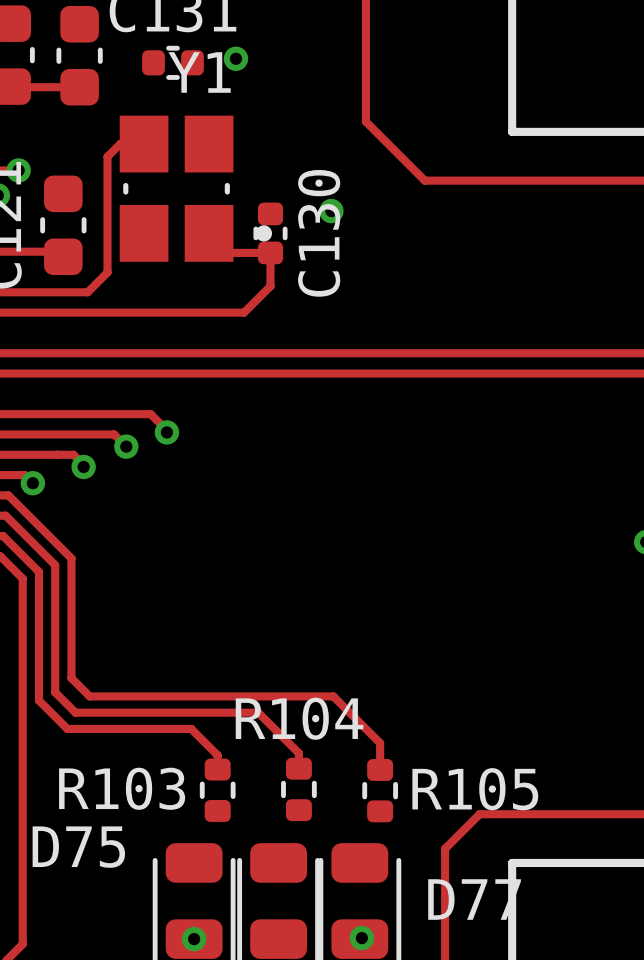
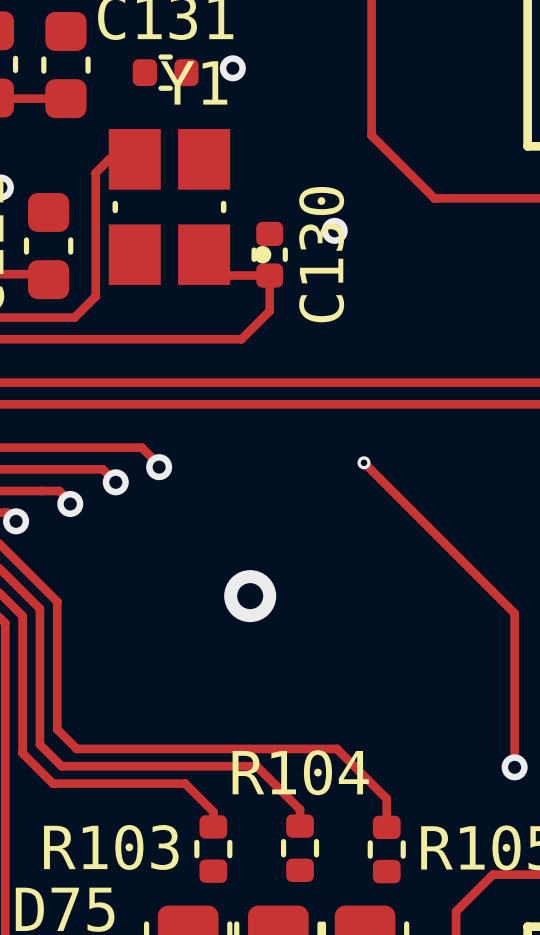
top track: none -> (363, 462) (514, 613) (514, 767)
via: none -> (363, 462)
via: none -> (250, 596)
via: none -> (514, 767)

